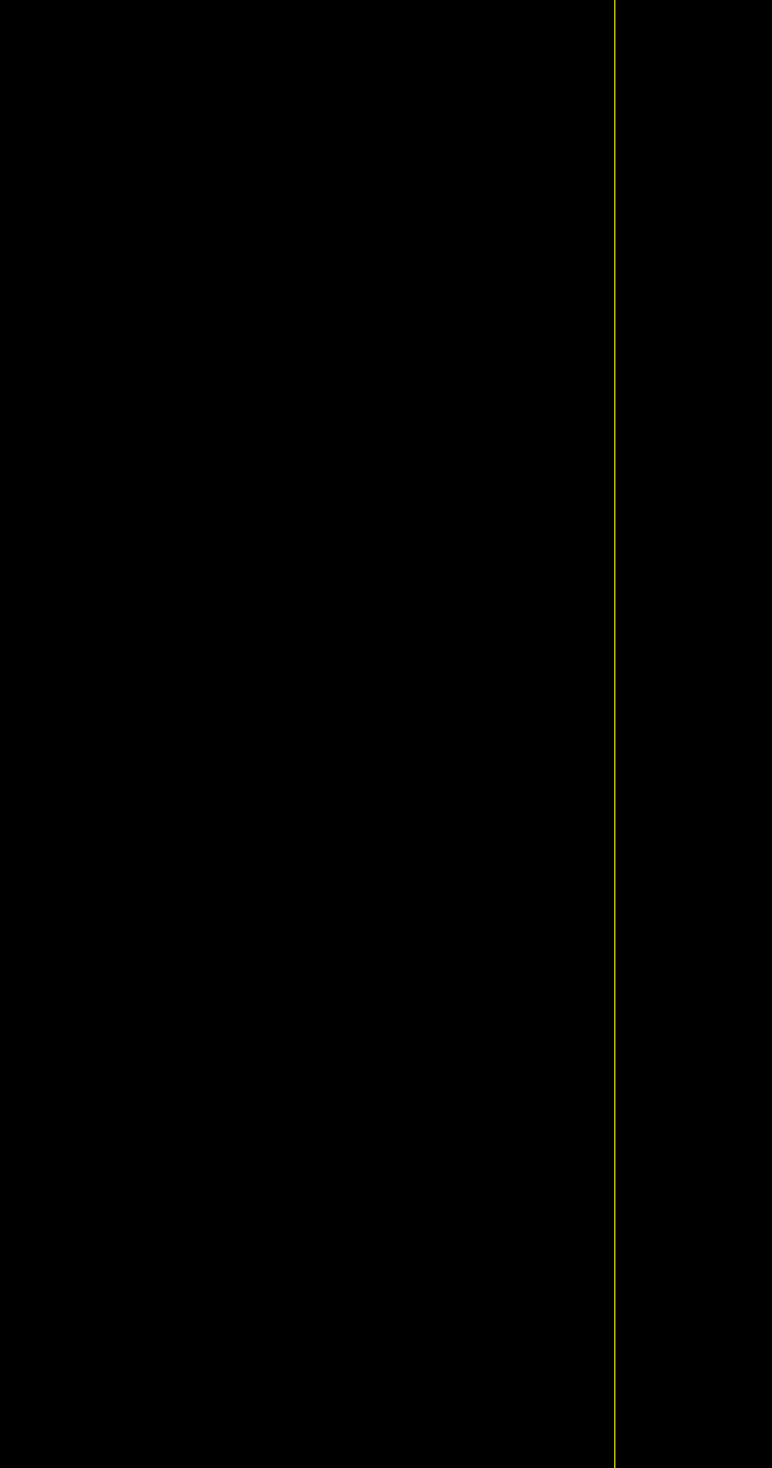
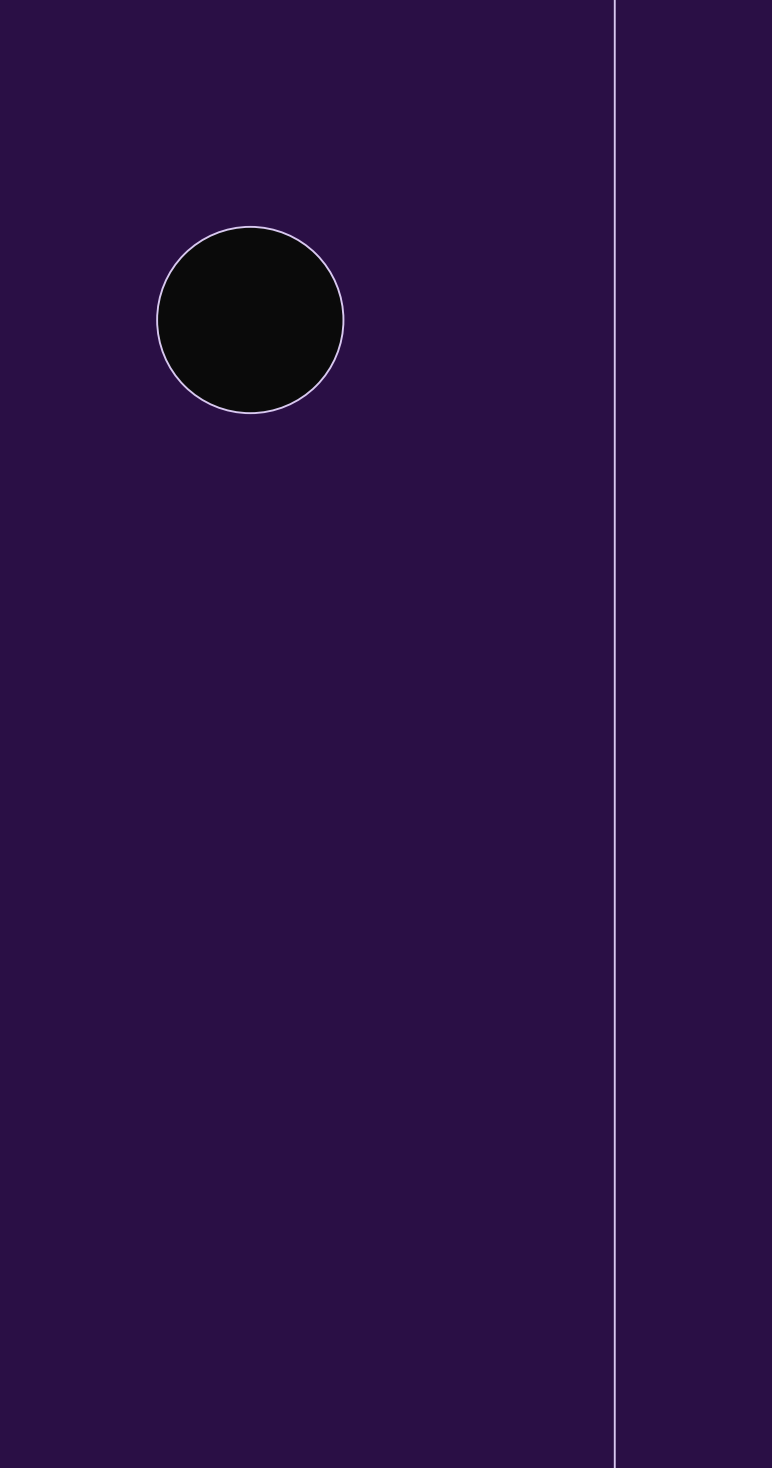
hole: none -> (250, 320)

